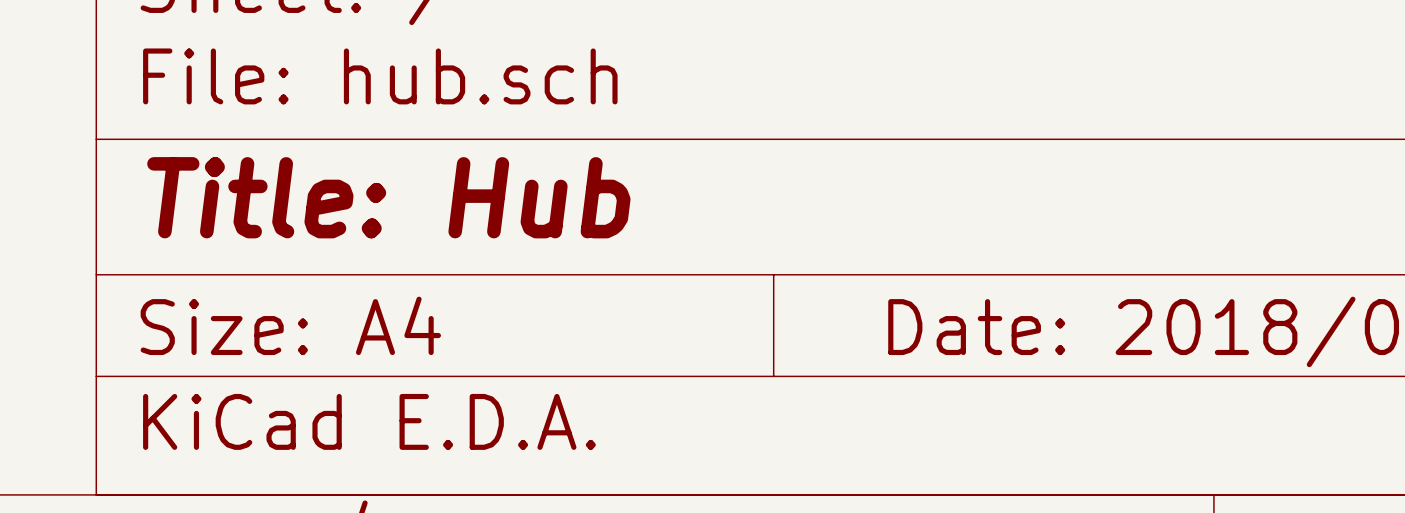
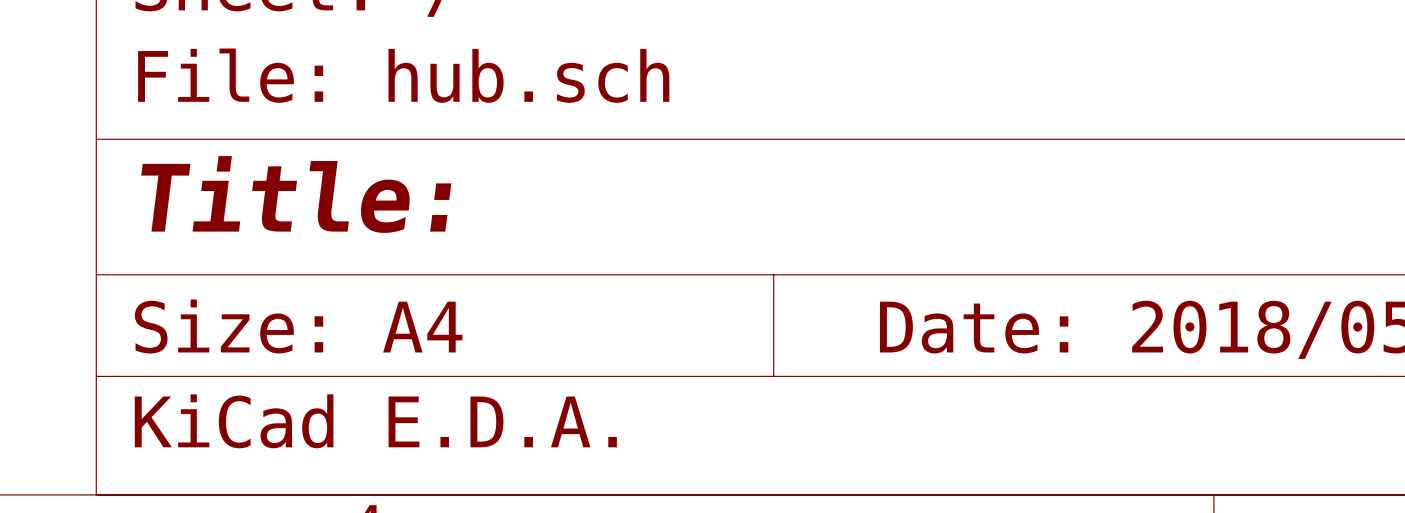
title block: Title: Hub (388, 197) -> Title: (296, 194)

